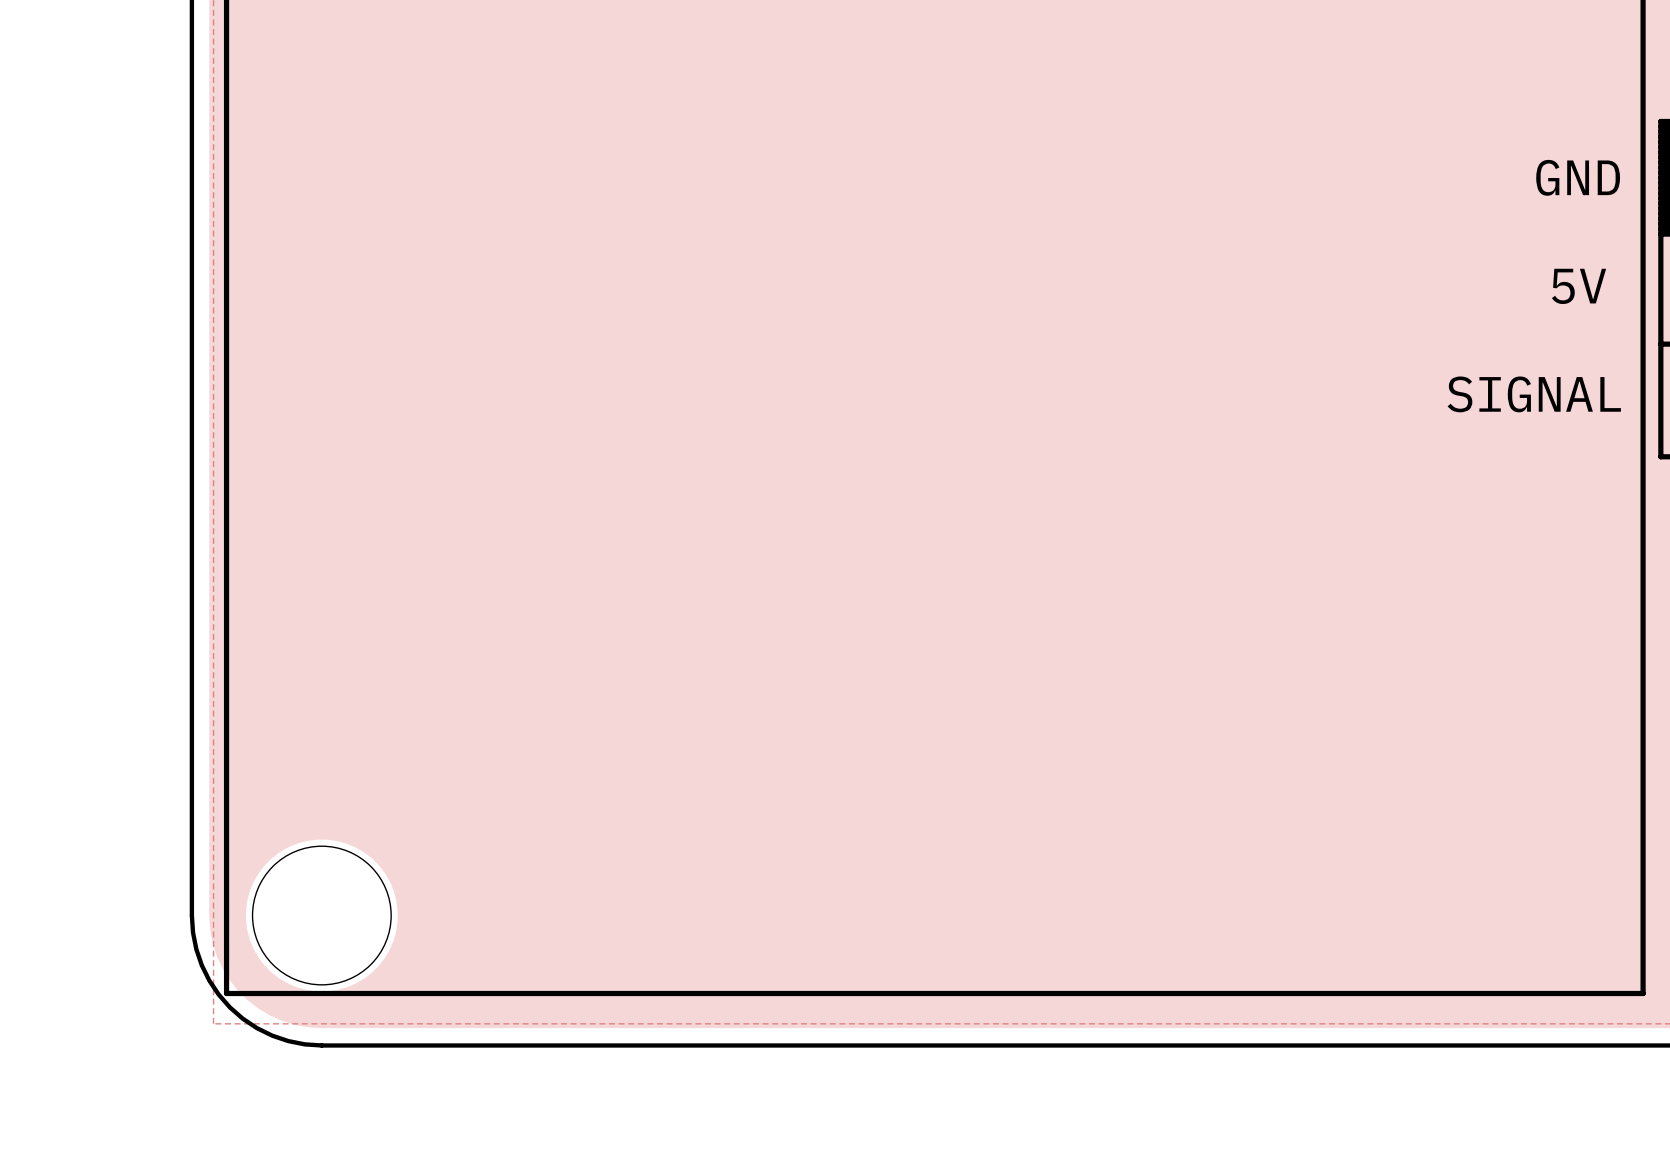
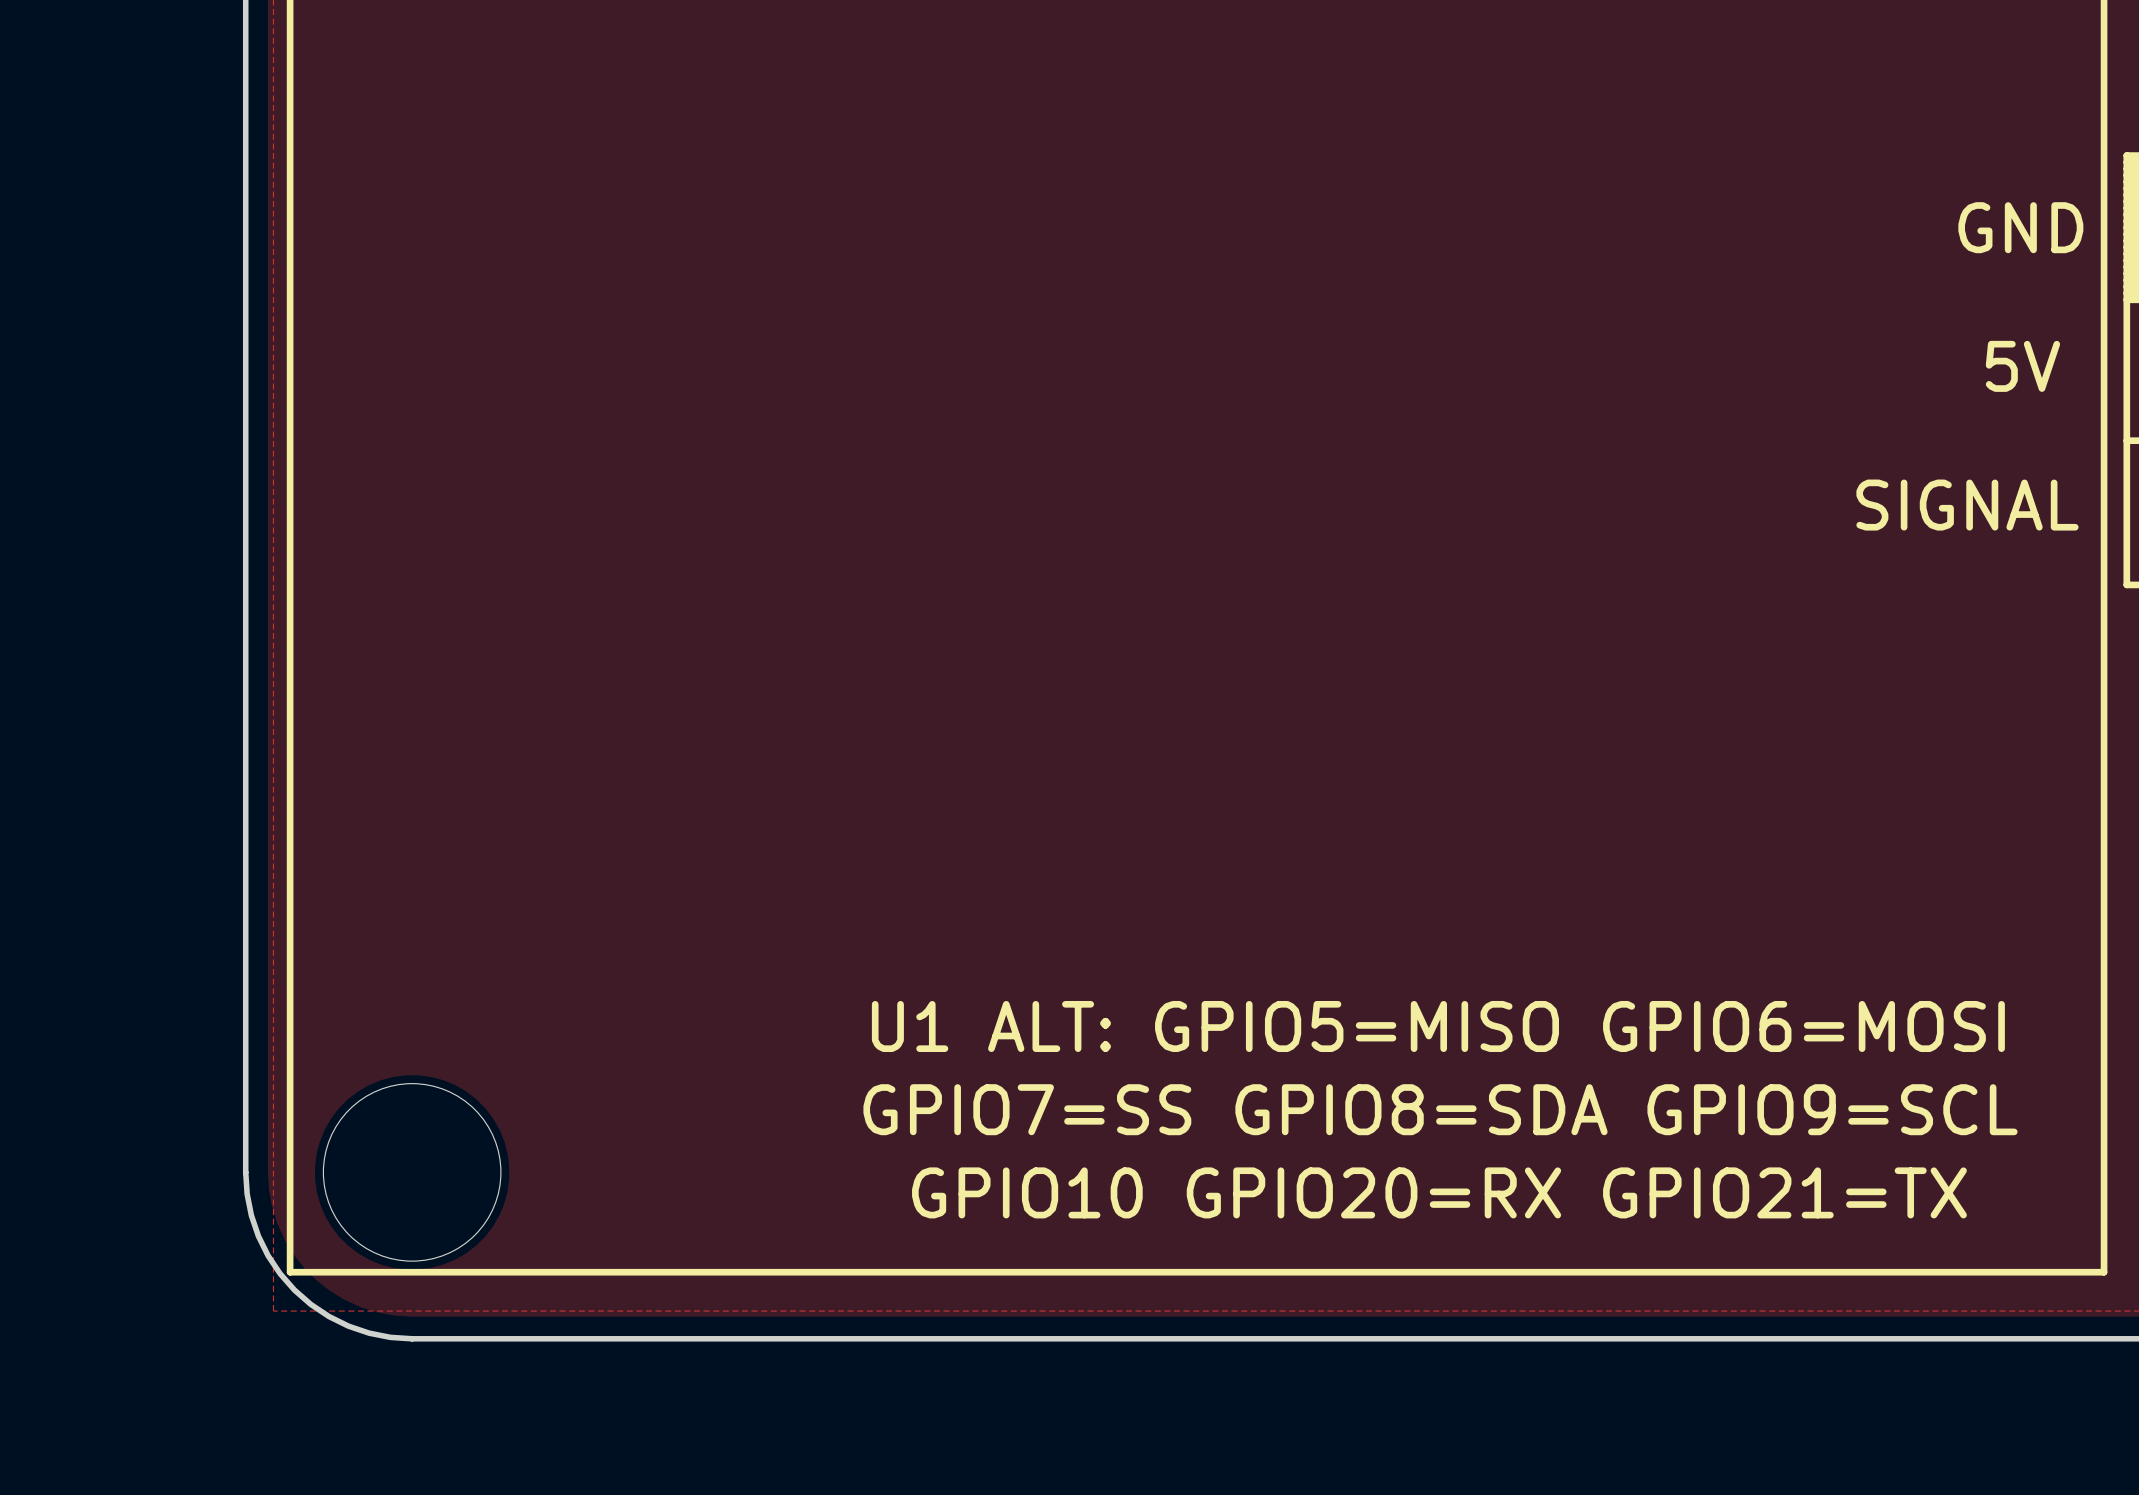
text: none -> U1 ALT: GPIO5=MISO GPIO6=MOSI (1438, 1026)
text: none -> GPIO7=SS GPIO8=SDA GPIO9=SCL (1440, 1109)
text: none -> GPIO10 GPIO20=RX GPIO21=TX (1439, 1192)

